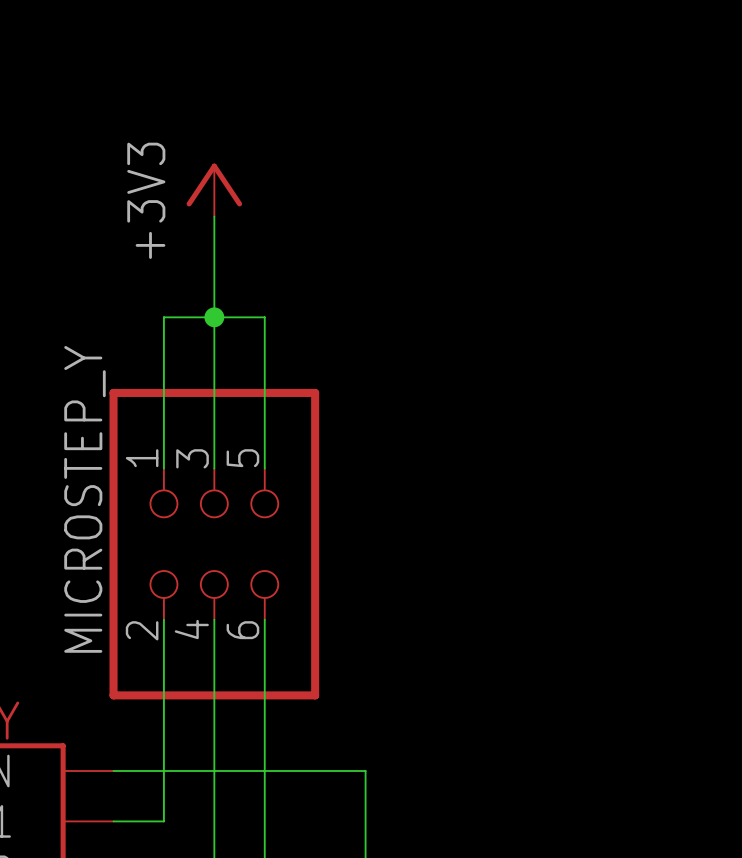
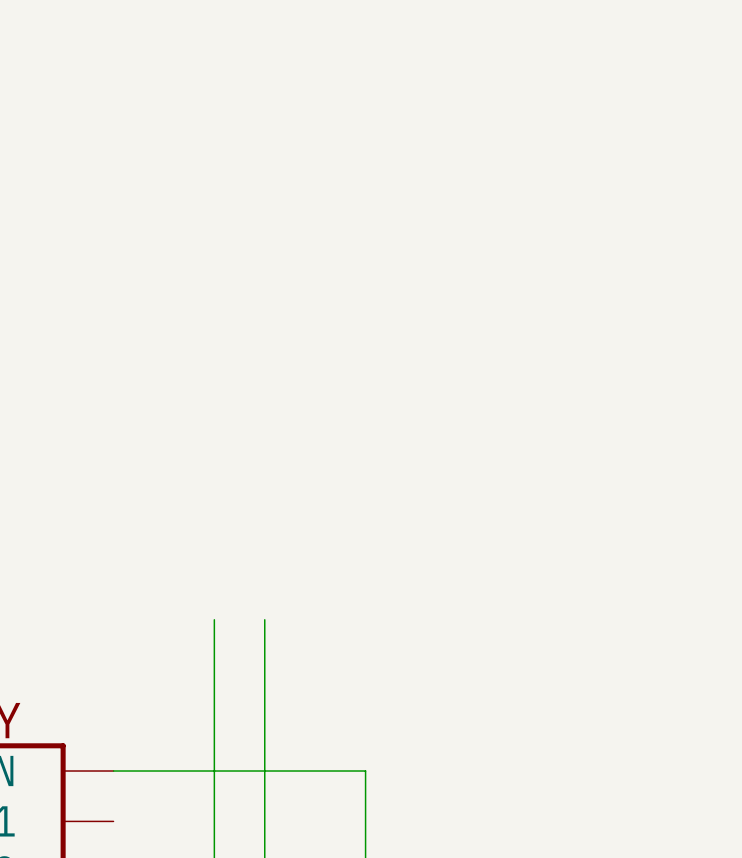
power symbol: +3V3 (214, 190) -> none
wire: (214, 216) (214, 468) -> none
junction: (214, 317) -> none
wire: (163, 468) (163, 317) (264, 317) (264, 468) -> none
MICROSTEP_Y: (214, 544) -> none
wire: (163, 619) (163, 821) (113, 821) -> none

